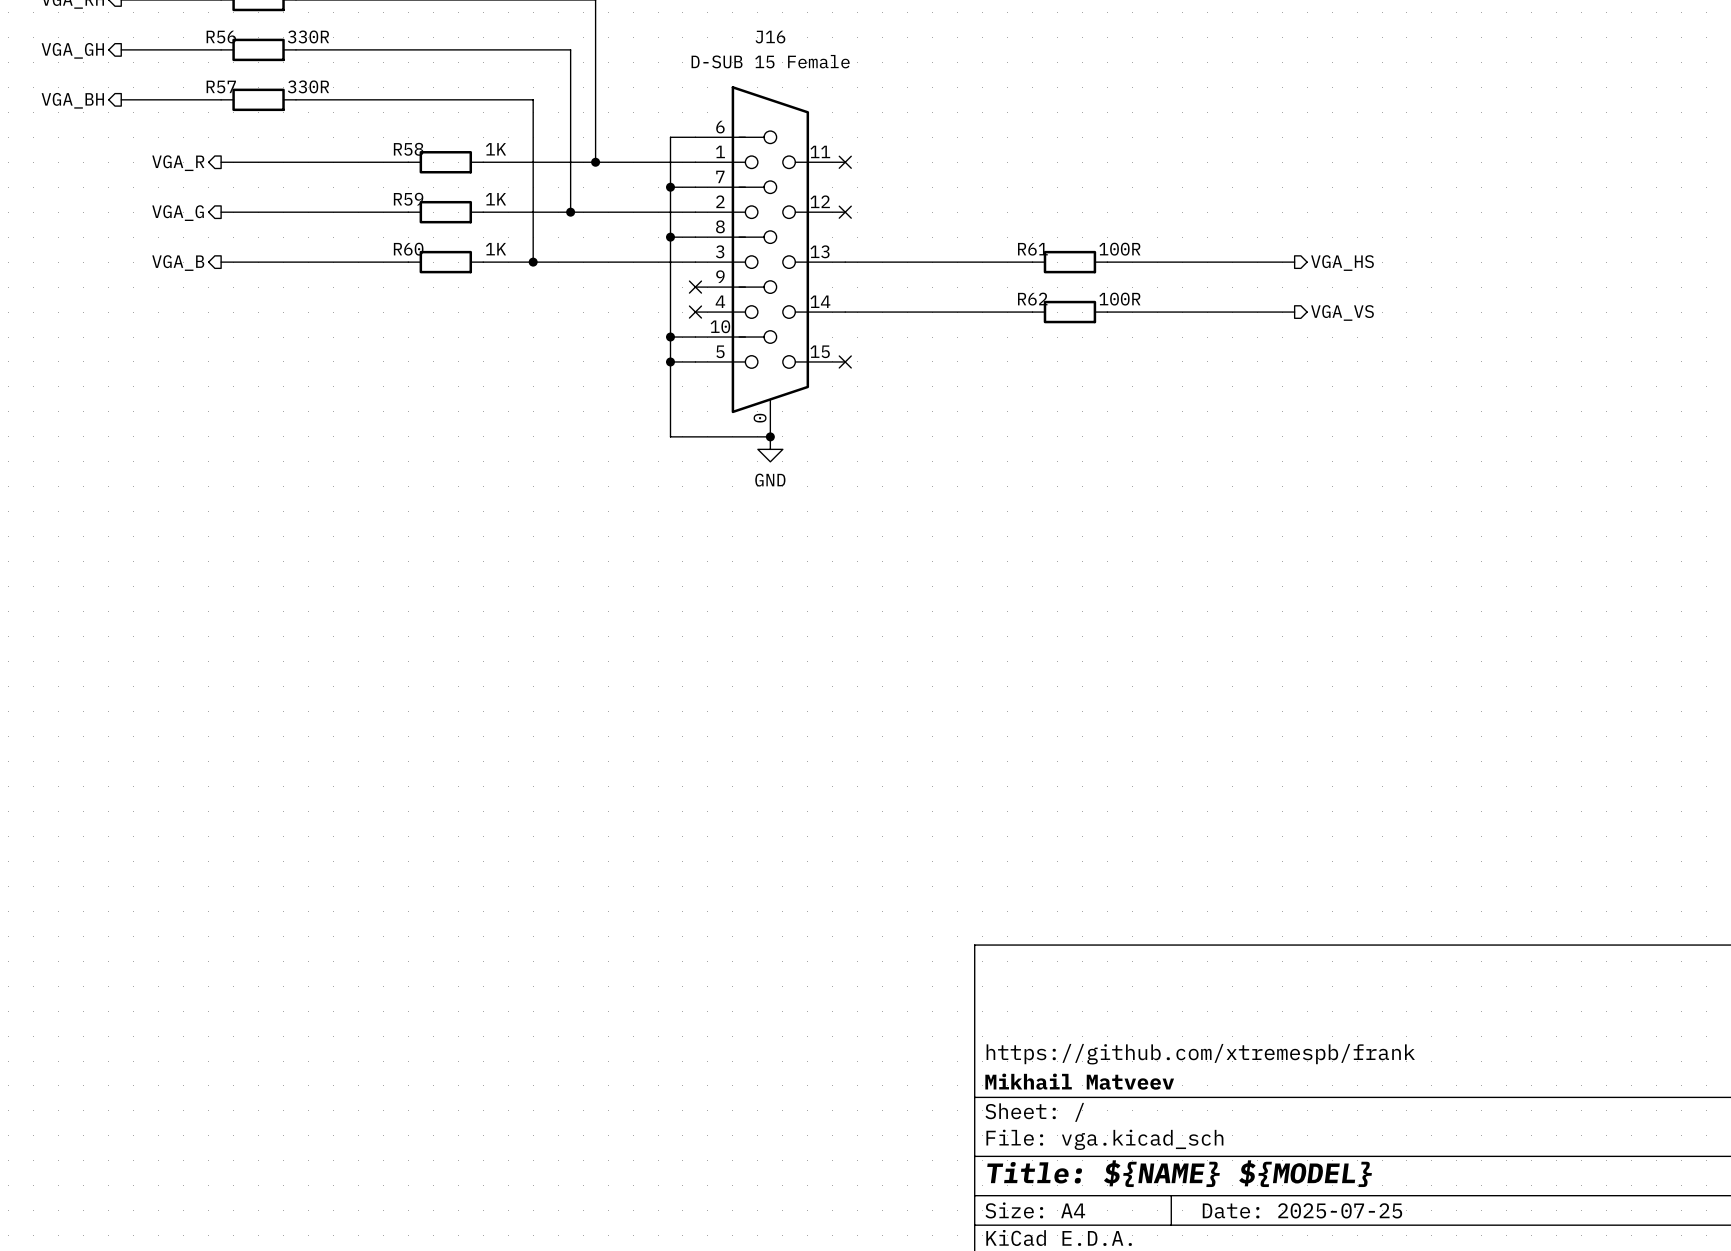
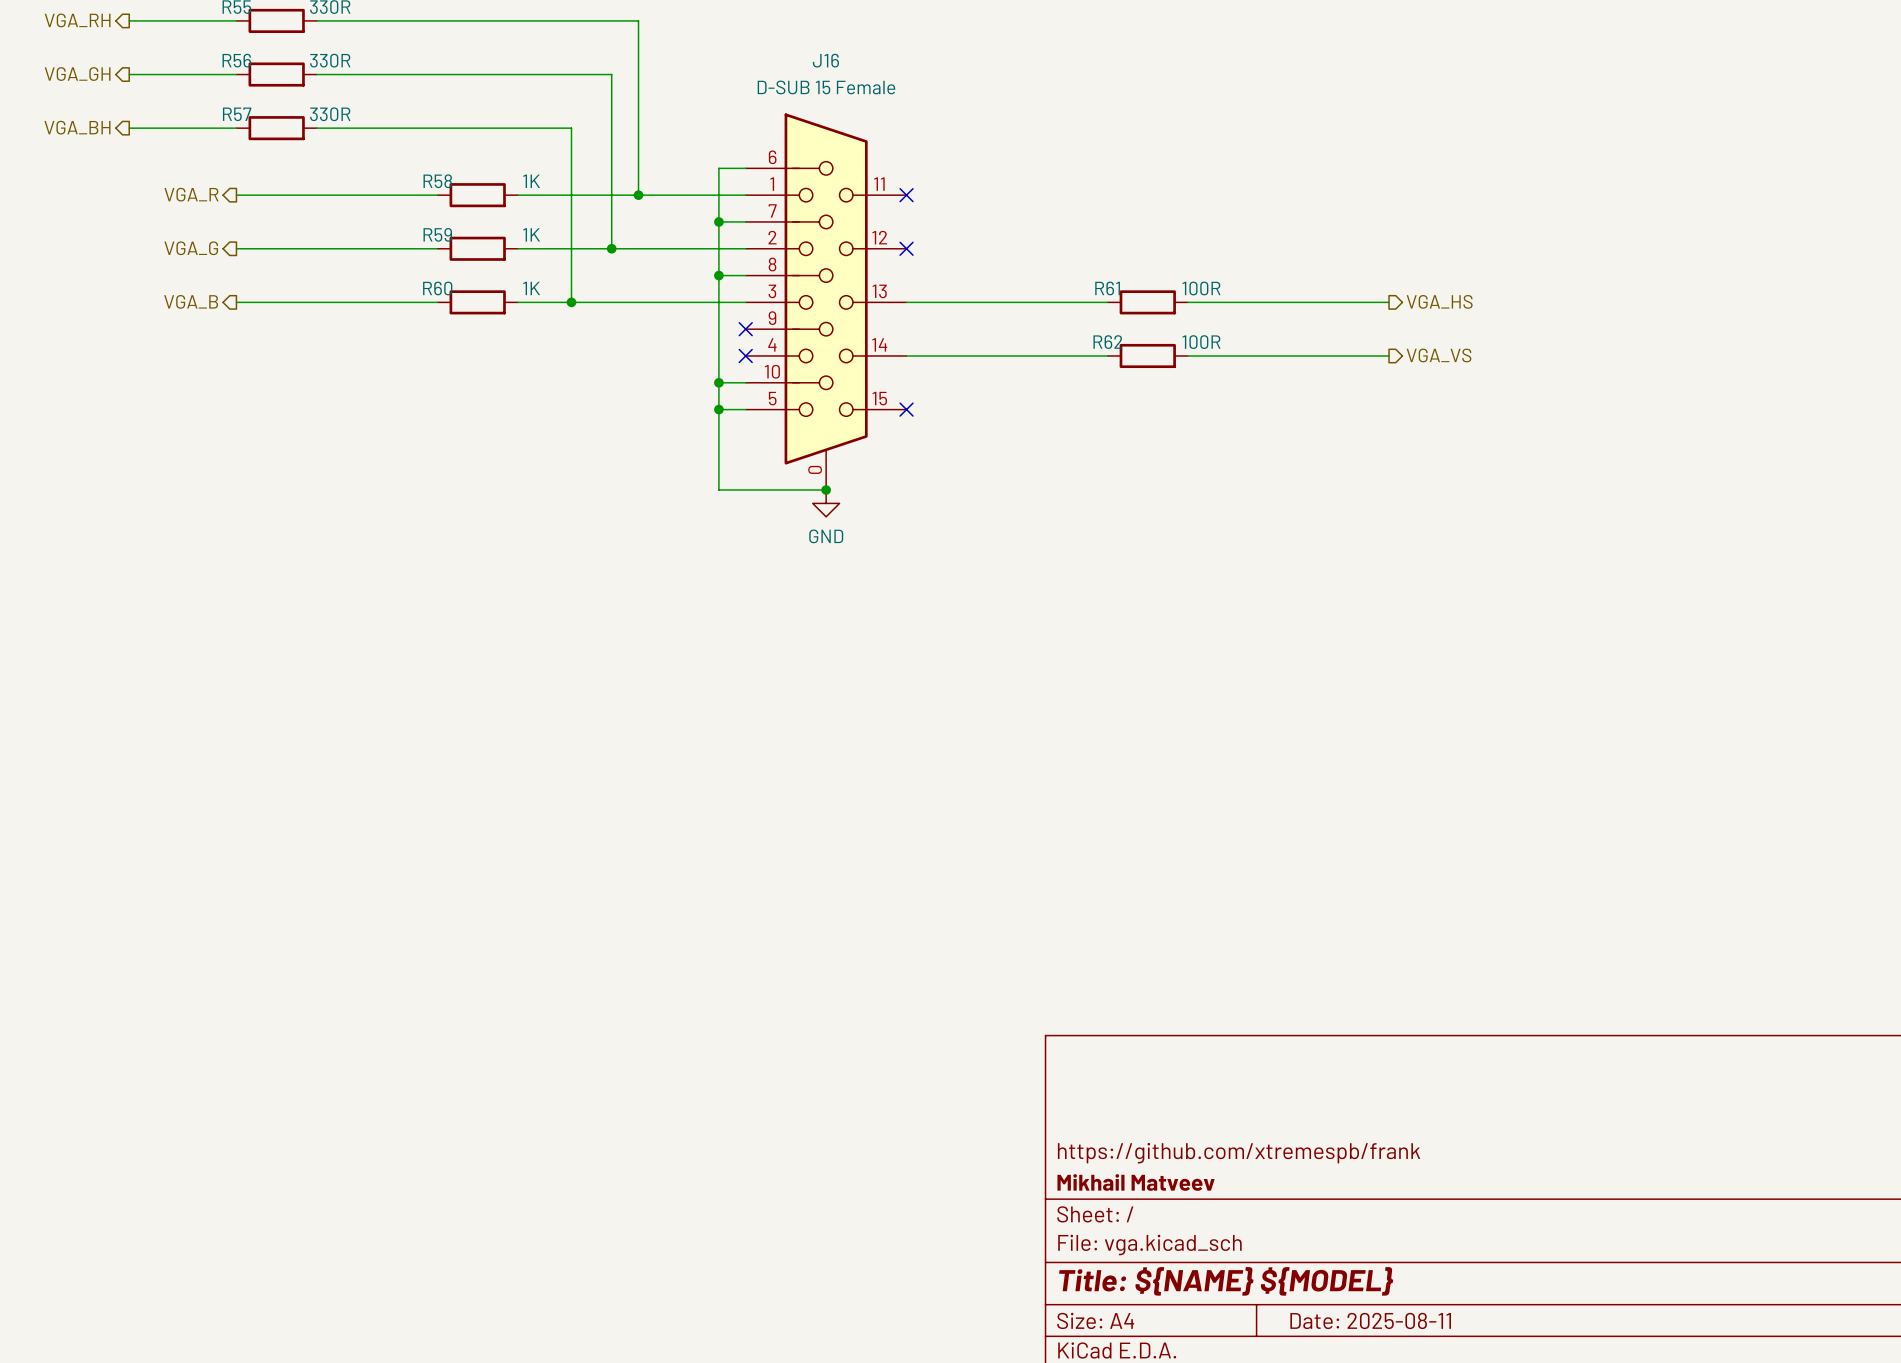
title block: Date: 2025-07-25 (1302, 1210) -> Date: 2025-08-11 (1370, 1320)

